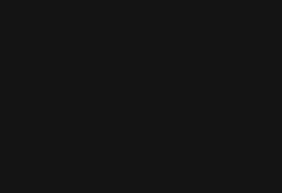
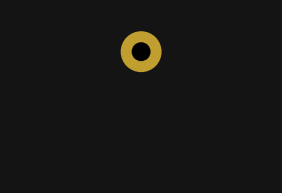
via: none -> (141, 51)

